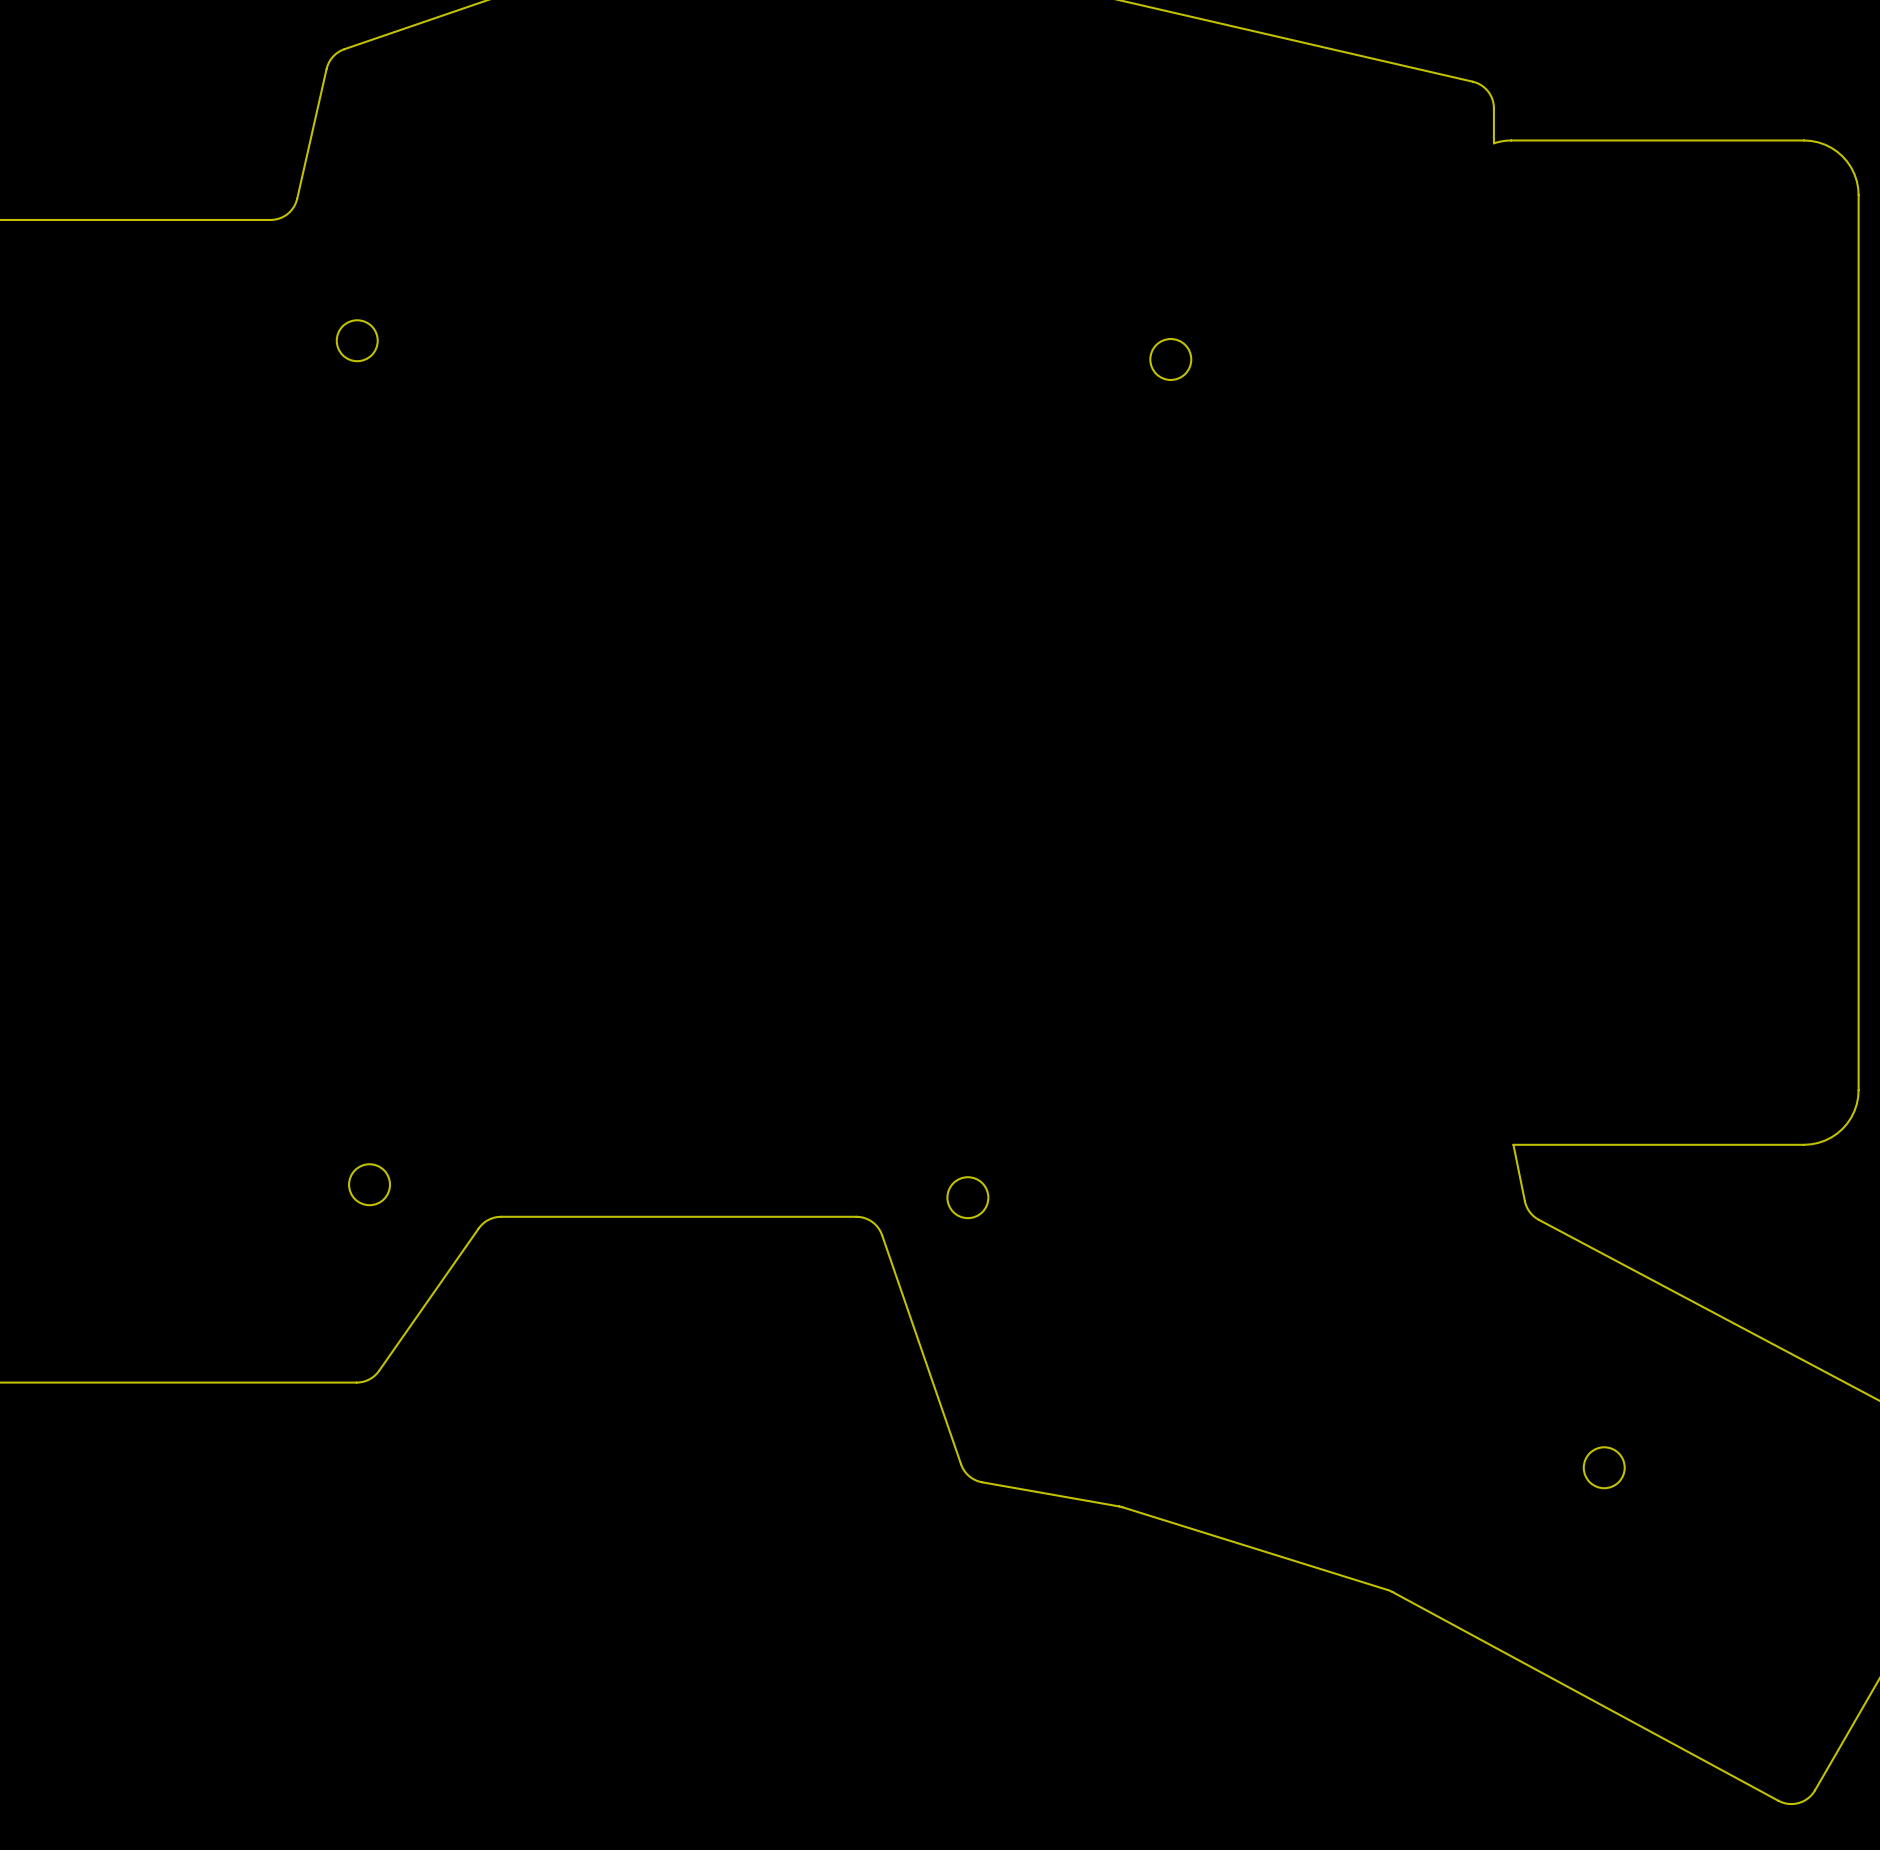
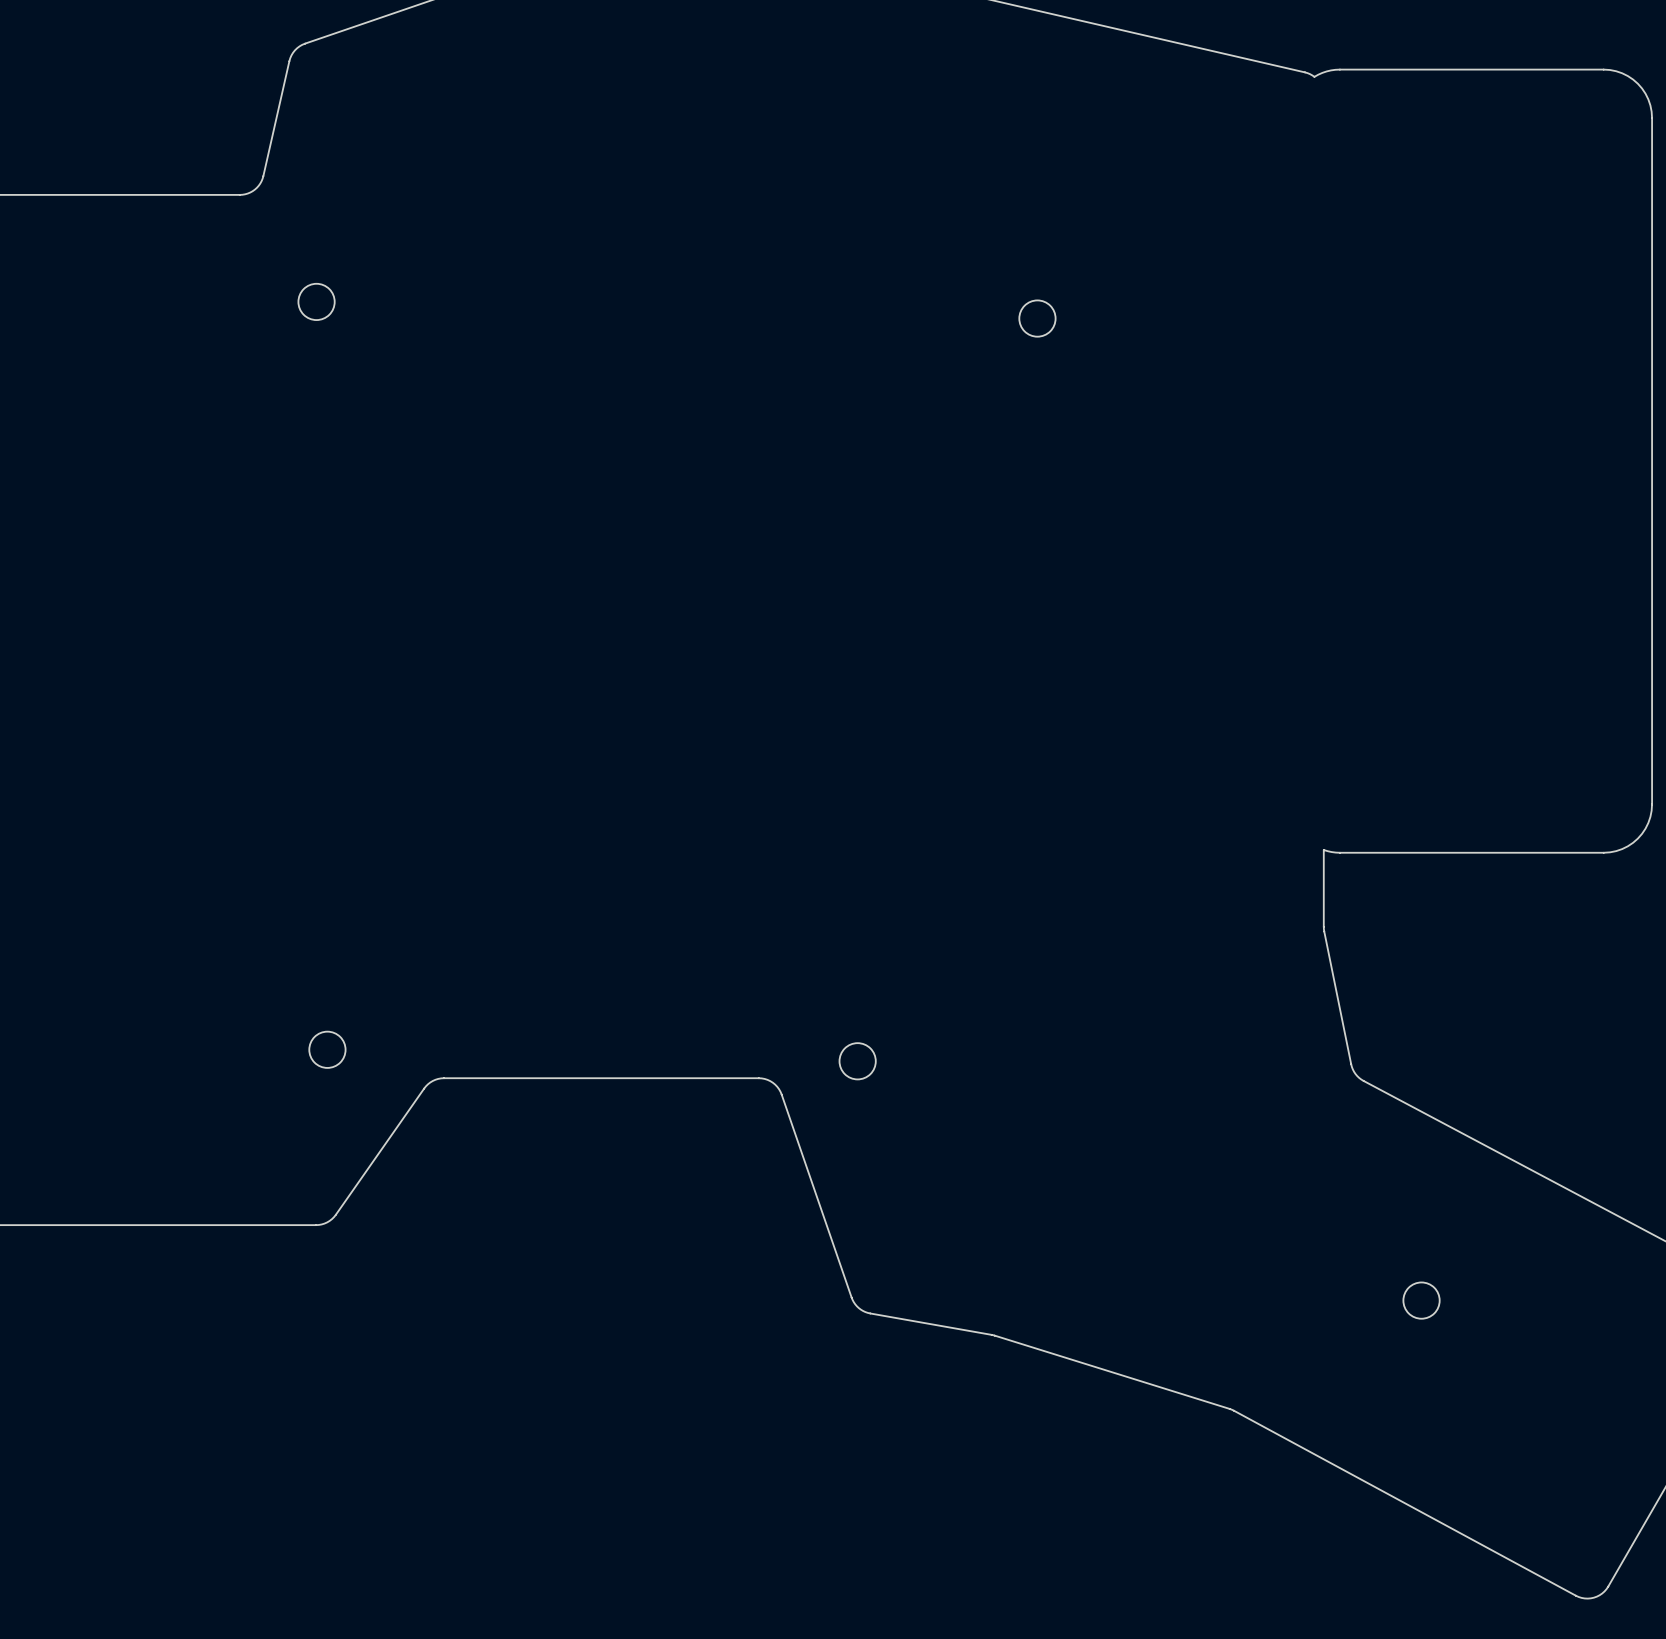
board edge: (1472, 81) (1485, 89) (1492, 99) (1493, 143) (1511, 140) (1811, 140) (1831, 147) (1847, 161) (1856, 180) (1858, 195) (1858, 1090) (1854, 1111) (1847, 1123) (1837, 1133) (1824, 1140) (1811, 1144) (1513, 1144) -> (1305, 72) (1314, 76) (1326, 71) (1339, 69) (1610, 70) (1627, 76) (1642, 88) (1648, 99) (1652, 117) (1652, 804) (1648, 822) (1642, 833) (1633, 842) (1622, 849) (1610, 852) (1339, 852) (1323, 849) (1323, 929) (1341, 1014)

